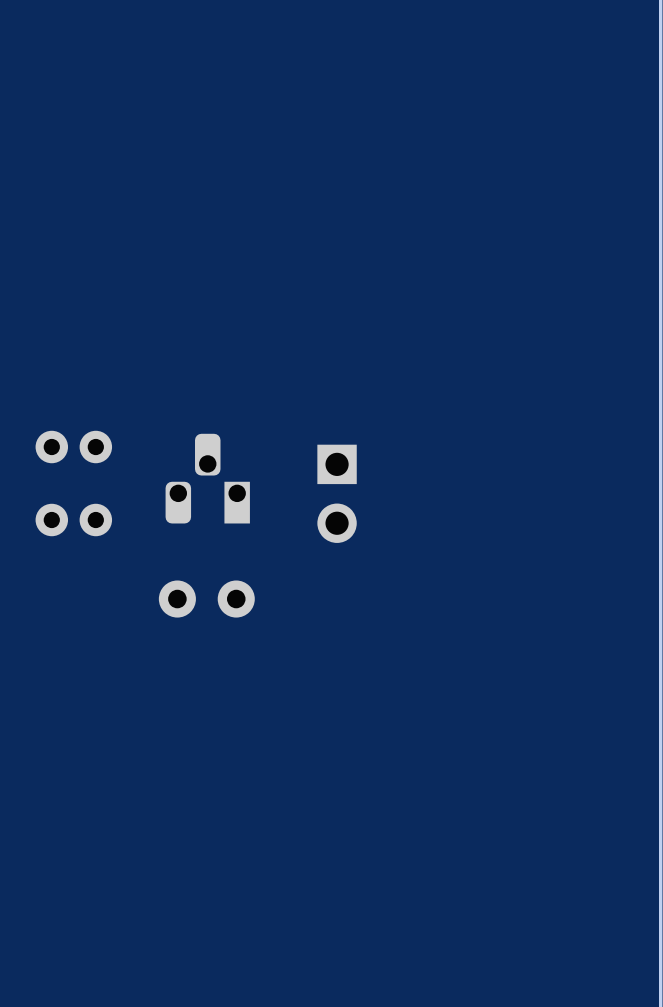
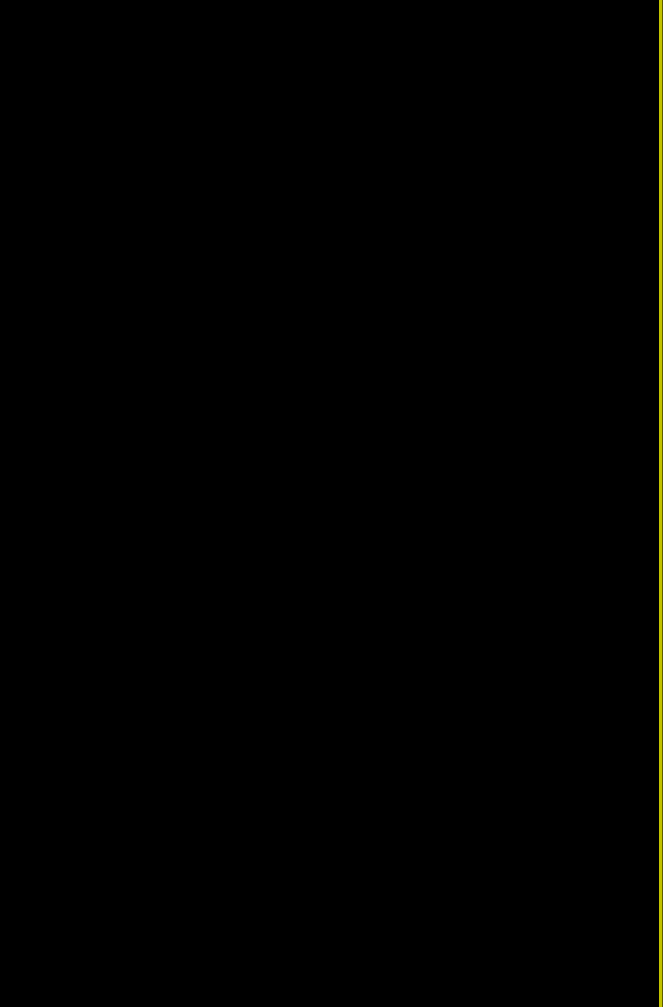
part: (73, 447) -> none
part: (207, 478) -> none
part: (337, 493) -> none
part: (73, 520) -> none
part: (206, 599) -> none

